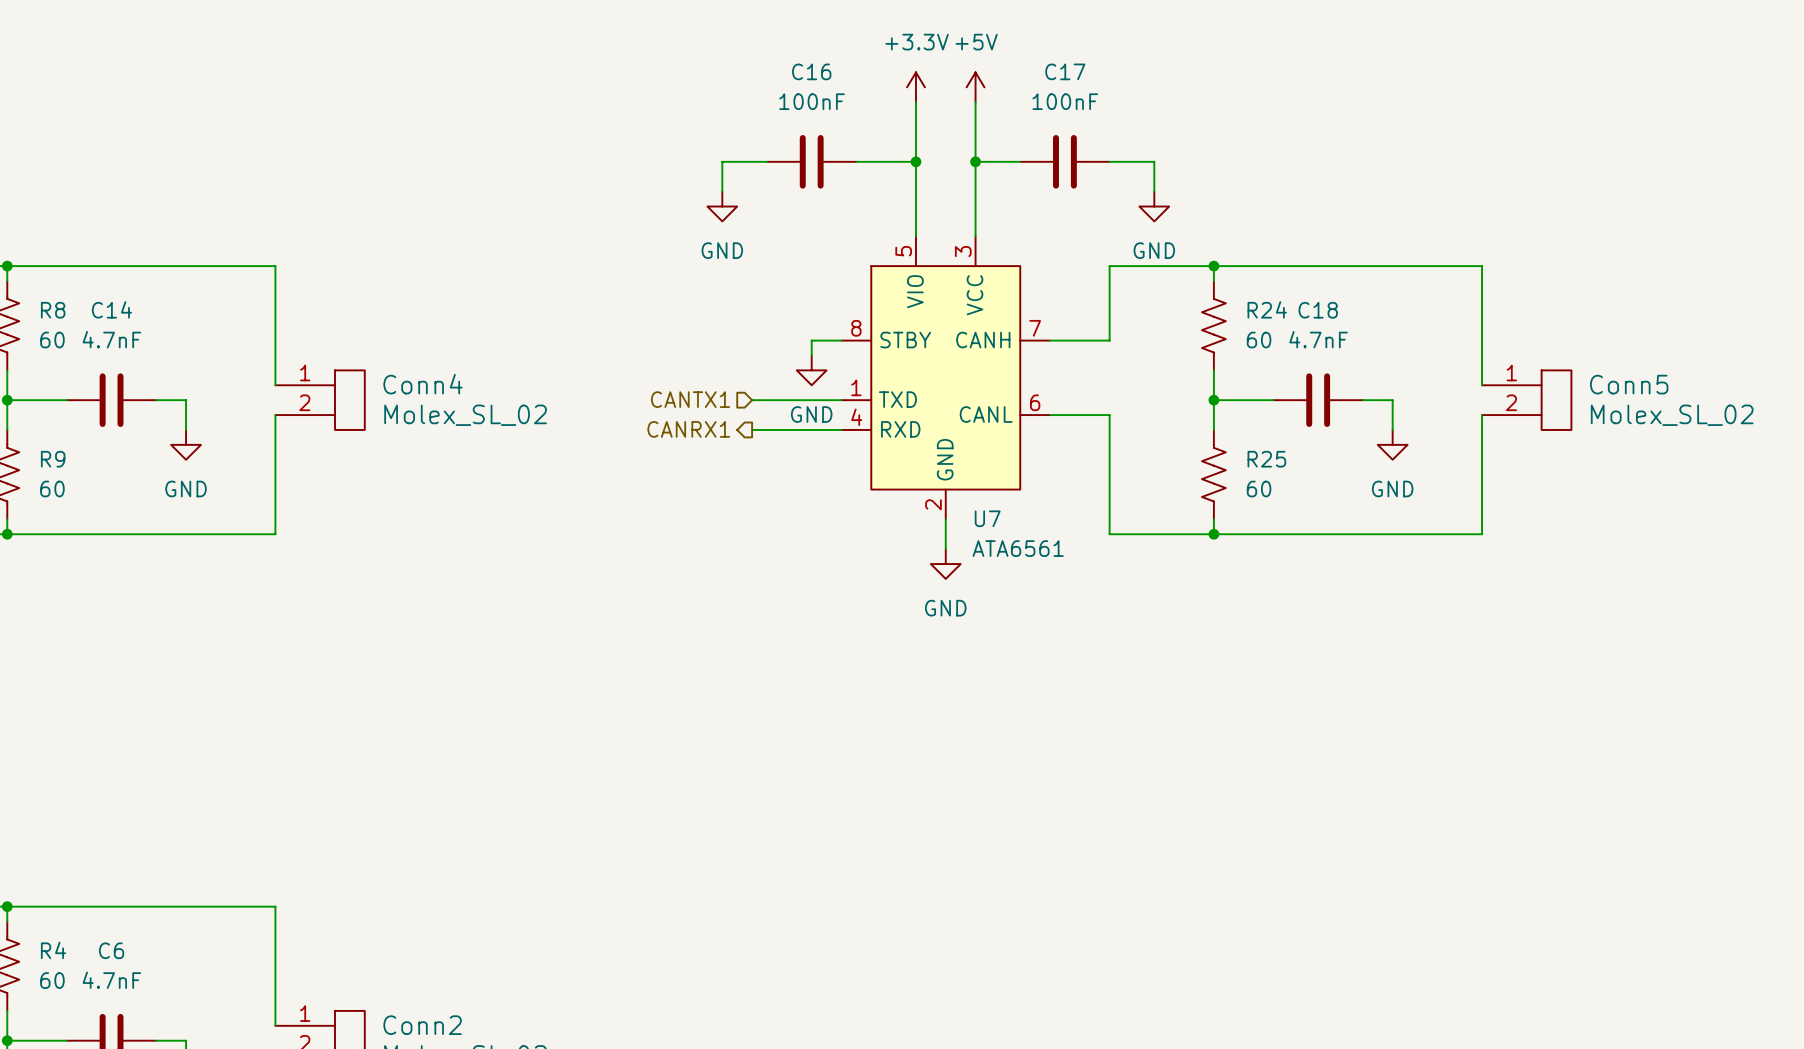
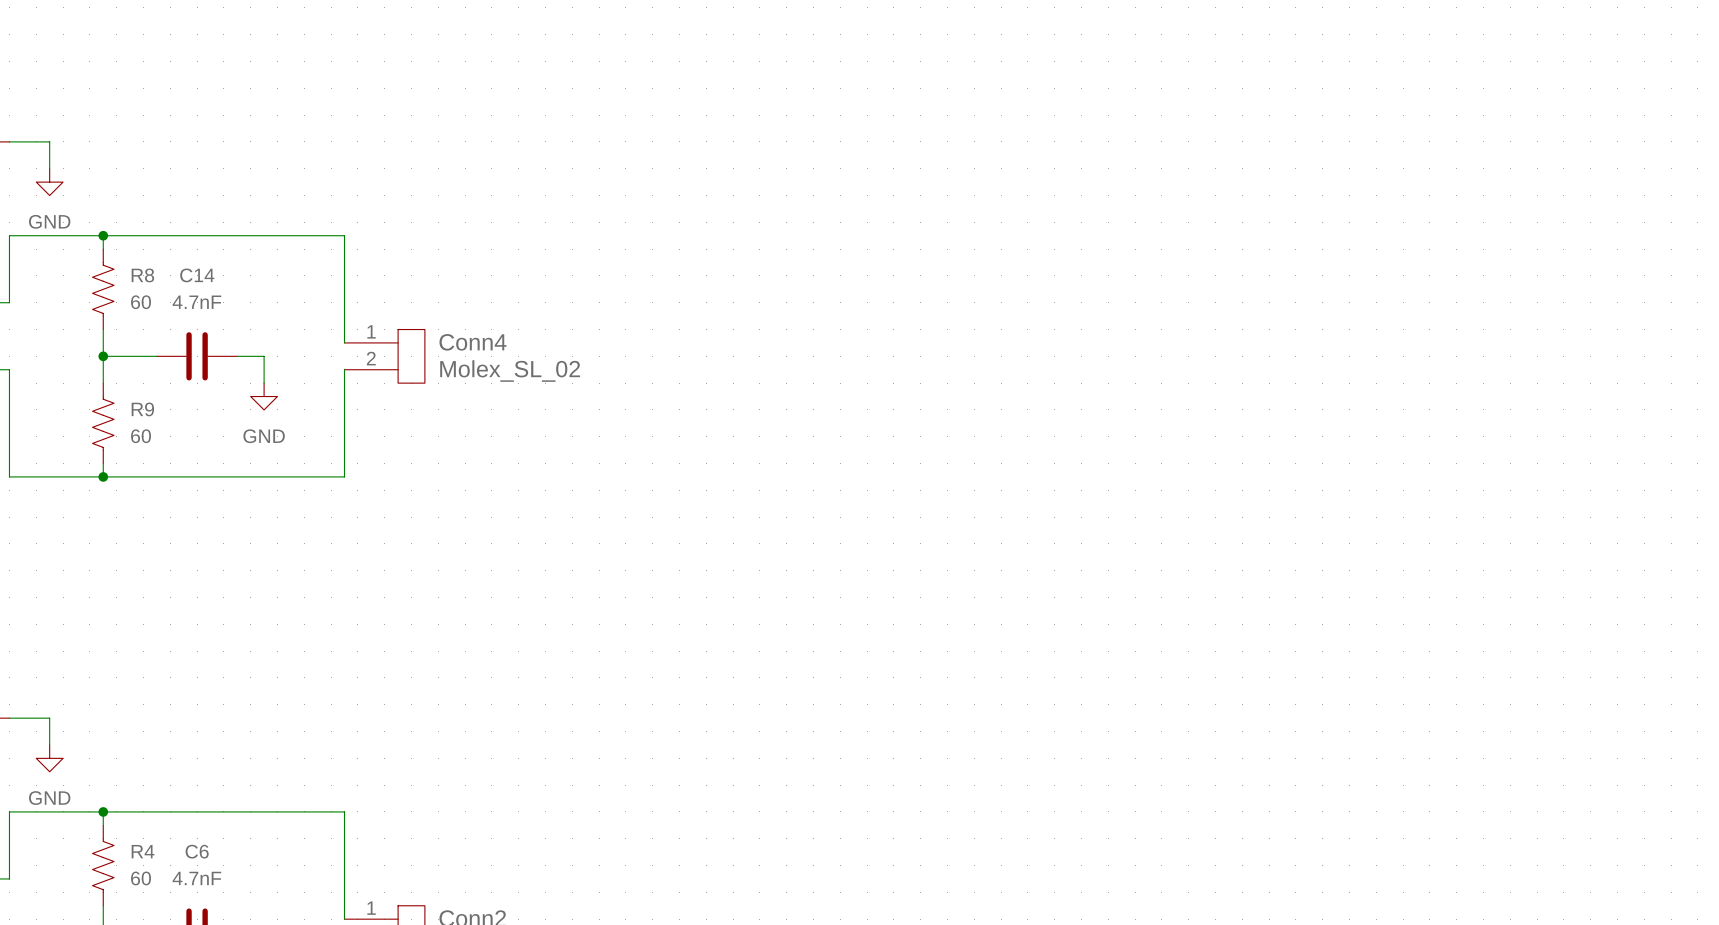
power symbol: +3.3V (915, 87) -> none
power symbol: +5V (975, 87) -> none
wire: (915, 102) (915, 236) -> none
wire: (975, 102) (975, 236) -> none
wire: (767, 161) (722, 161) (722, 191) -> none
C16: 100nF (811, 161) -> none
wire: (856, 161) (915, 161) -> none
junction: (915, 161) -> none
wire: (975, 161) (1020, 161) -> none
junction: (975, 161) -> none
C17: 100nF (1064, 161) -> none
wire: (1109, 161) (1154, 161) (1154, 191) -> none
power symbol: GND (722, 206) -> none
power symbol: GND (1154, 206) -> none
wire: (1213, 266) (1213, 281) -> none
junction: (1213, 266) -> none
R24: 60 (1213, 325) -> none
wire: (841, 340) (811, 340) (811, 355) -> none
wire: (1050, 340) (1109, 340) (1109, 266) (1482, 266) (1482, 385) -> none
power symbol: GND (811, 370) -> none
wire: (1213, 370) (1213, 429) -> none
U7: ATA6561 (945, 377) -> none
hierarchical label: CANTX1 (690, 399) -> none
wire: (752, 400) (841, 400) -> none
wire: (1213, 400) (1273, 400) -> none
junction: (1213, 400) -> none
C18: 4.7nF (1318, 400) -> none
wire: (1362, 400) (1392, 400) (1392, 429) -> none
Conn5: Molex_SL_02 (1526, 400) -> none
wire: (1050, 415) (1109, 415) (1109, 534) (1482, 534) (1482, 415) -> none
hierarchical label: CANRX1 (688, 429) -> none
wire: (752, 429) (841, 429) -> none
power symbol: GND (1392, 444) -> none
R25: 60 (1213, 474) -> none
wire: (945, 519) (945, 549) -> none
wire: (1213, 519) (1213, 534) -> none
junction: (1213, 534) -> none
power symbol: GND (945, 564) -> none

